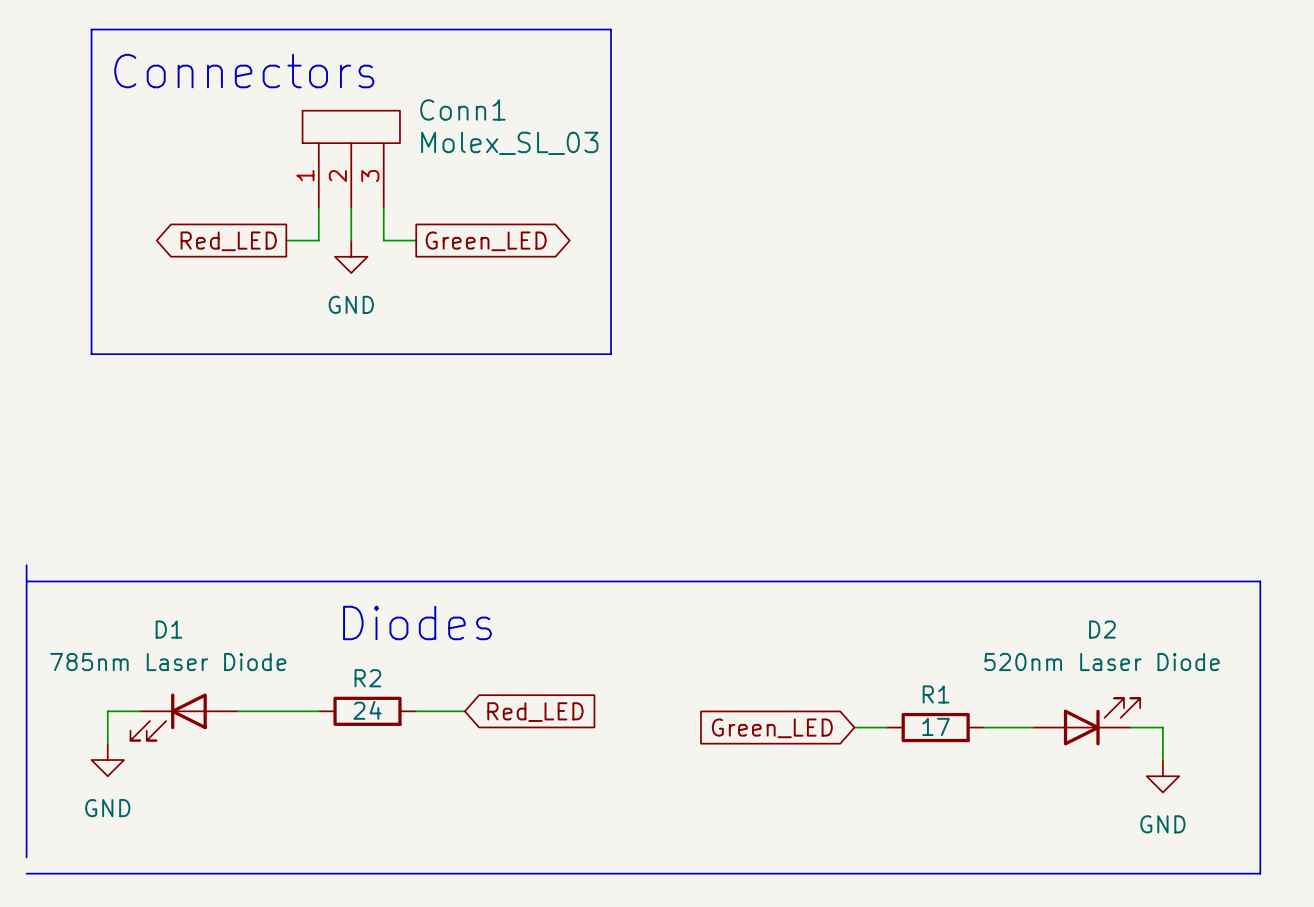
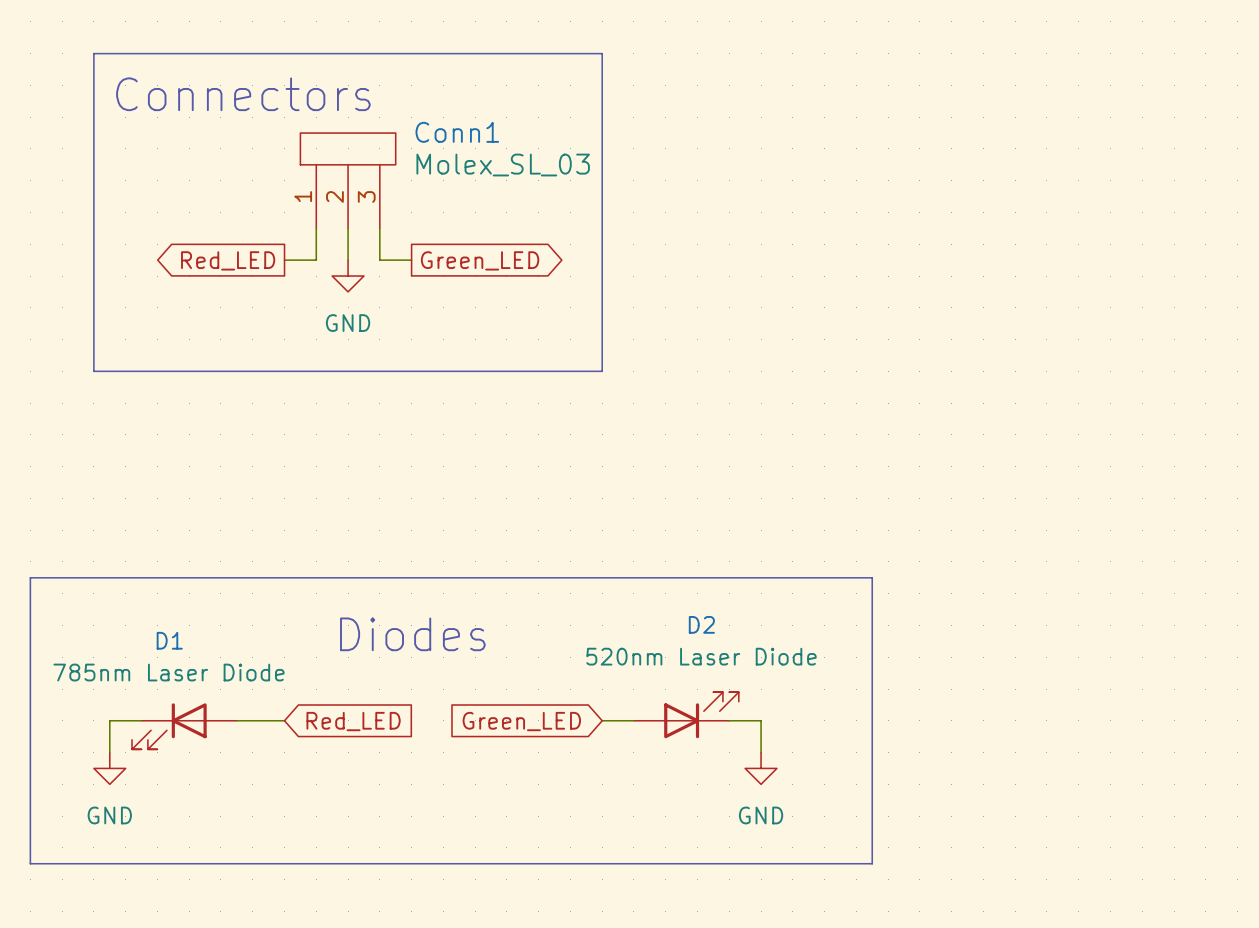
line: none -> (30, 577) (872, 577) (872, 863) (30, 863)
line: (26, 581) (1260, 581) (1260, 873) (26, 873) -> none
wire: (286, 711) (318, 711) -> none
R2: 24 (367, 711) -> none
wire: (416, 711) (464, 711) -> none
wire: none -> (729, 720) (761, 720) (761, 752)
global label position: Red_LED (535, 712) -> Red_LED (353, 721)
D2 position: (1086, 721) -> (686, 715)
wire: (854, 727) (886, 727) -> (602, 720) (633, 720)
R1: 17 (935, 727) -> none
wire: (984, 727) (1033, 727) -> none
wire: (1130, 727) (1162, 727) (1162, 760) -> none
global label position: Green_LED (772, 728) -> Green_LED (521, 721)
power symbol: none -> GND (761, 768)
power symbol: GND (1162, 776) -> none

